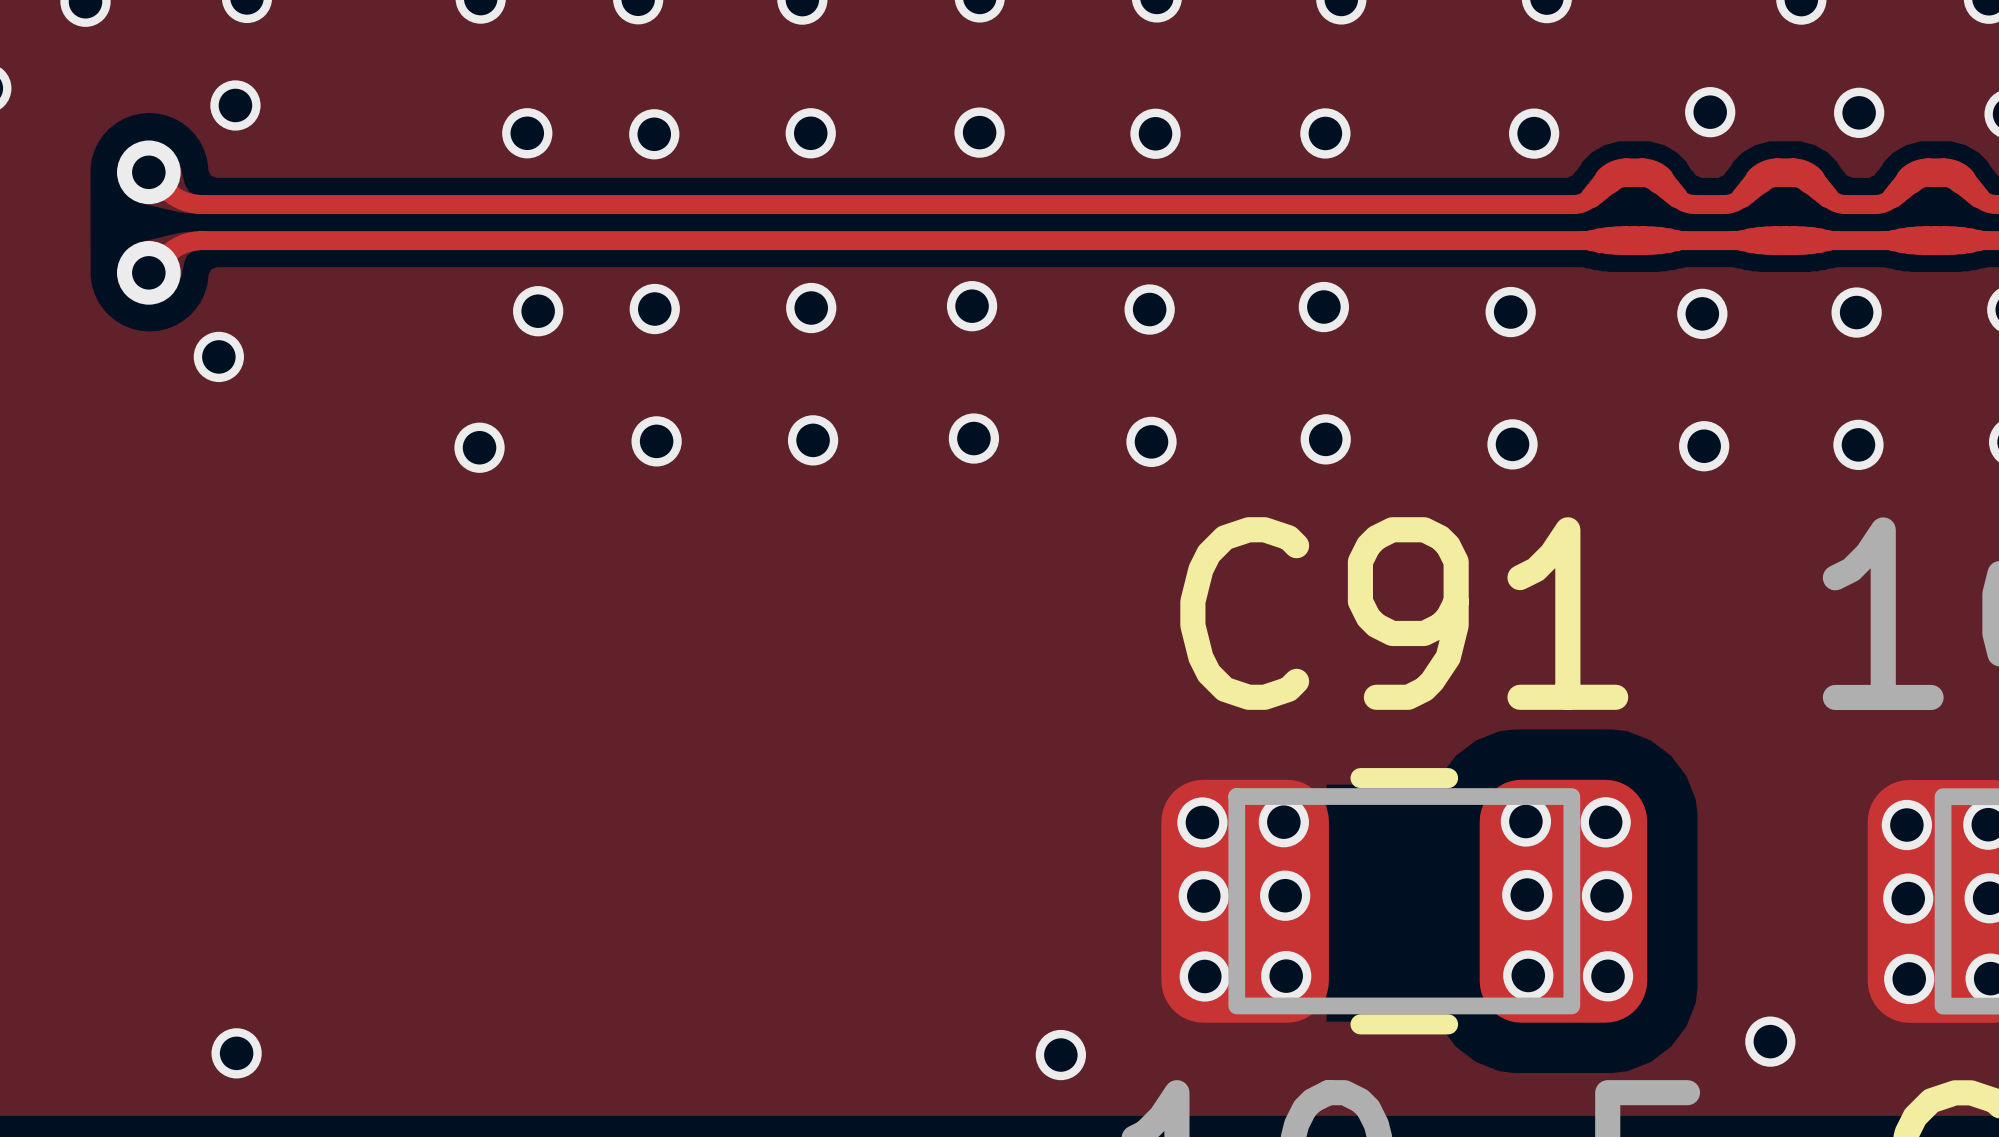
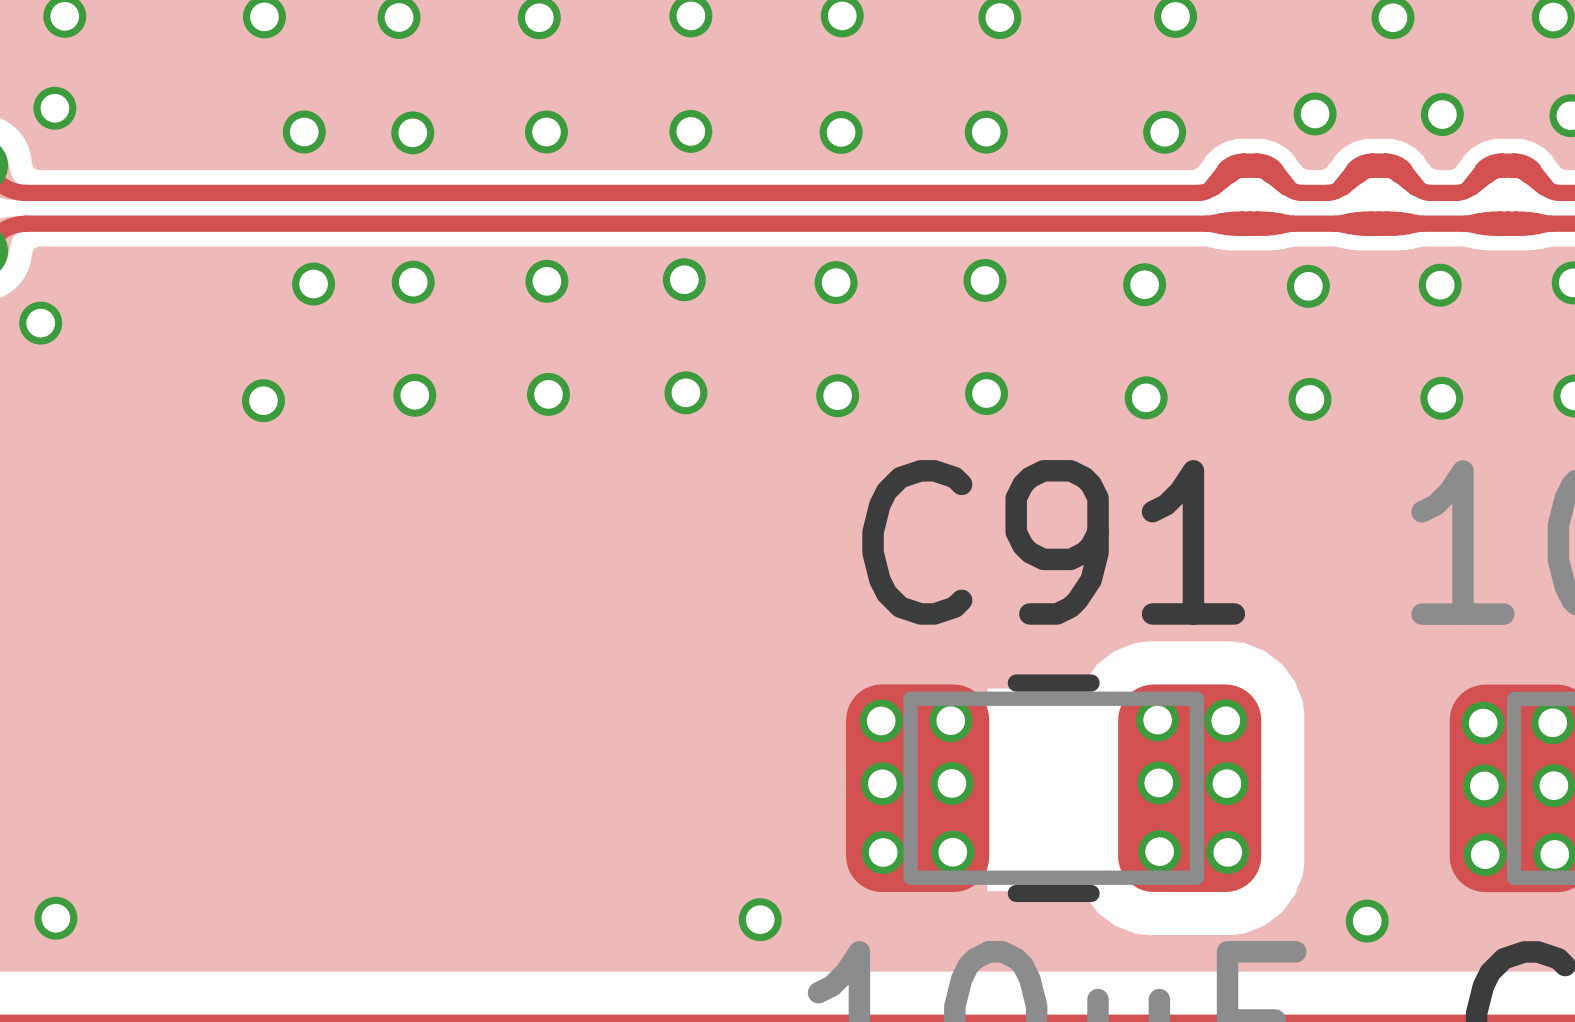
via position: (1770, 1041) -> (1367, 921)

